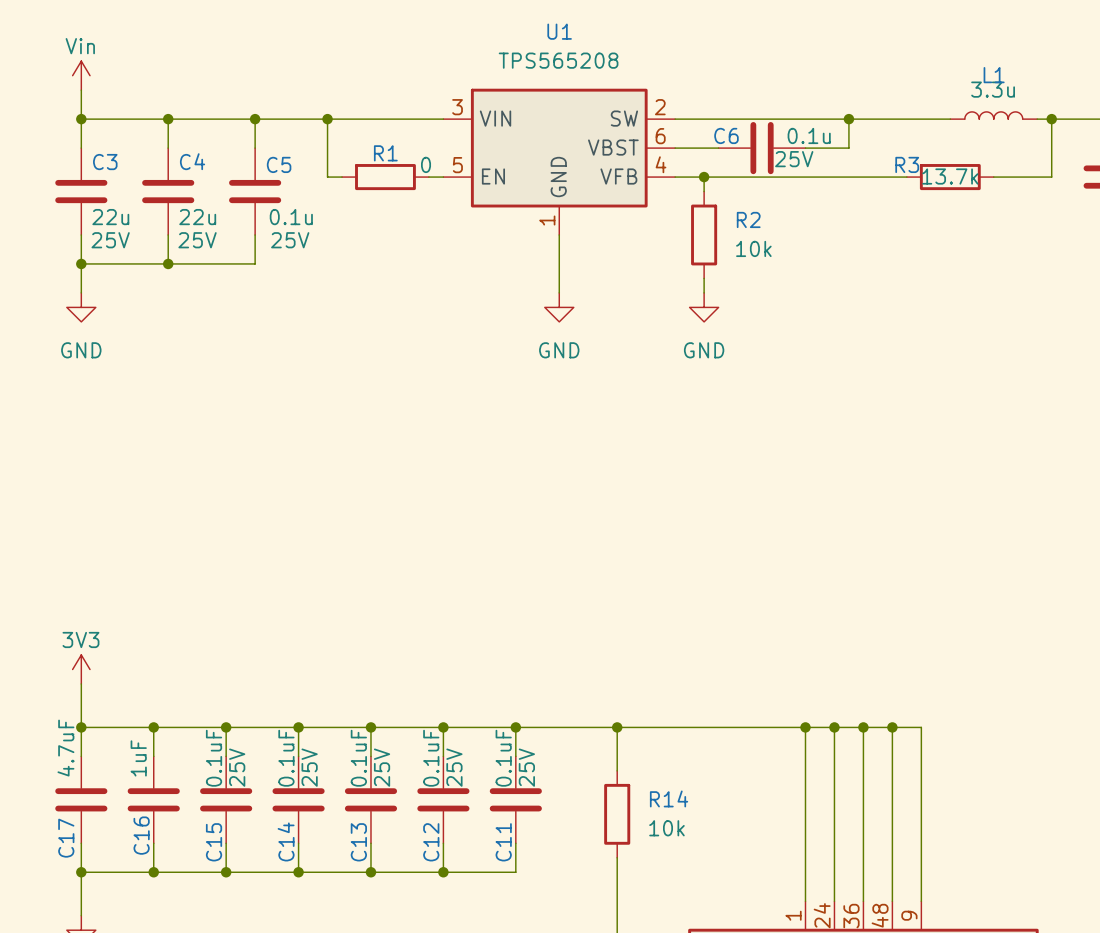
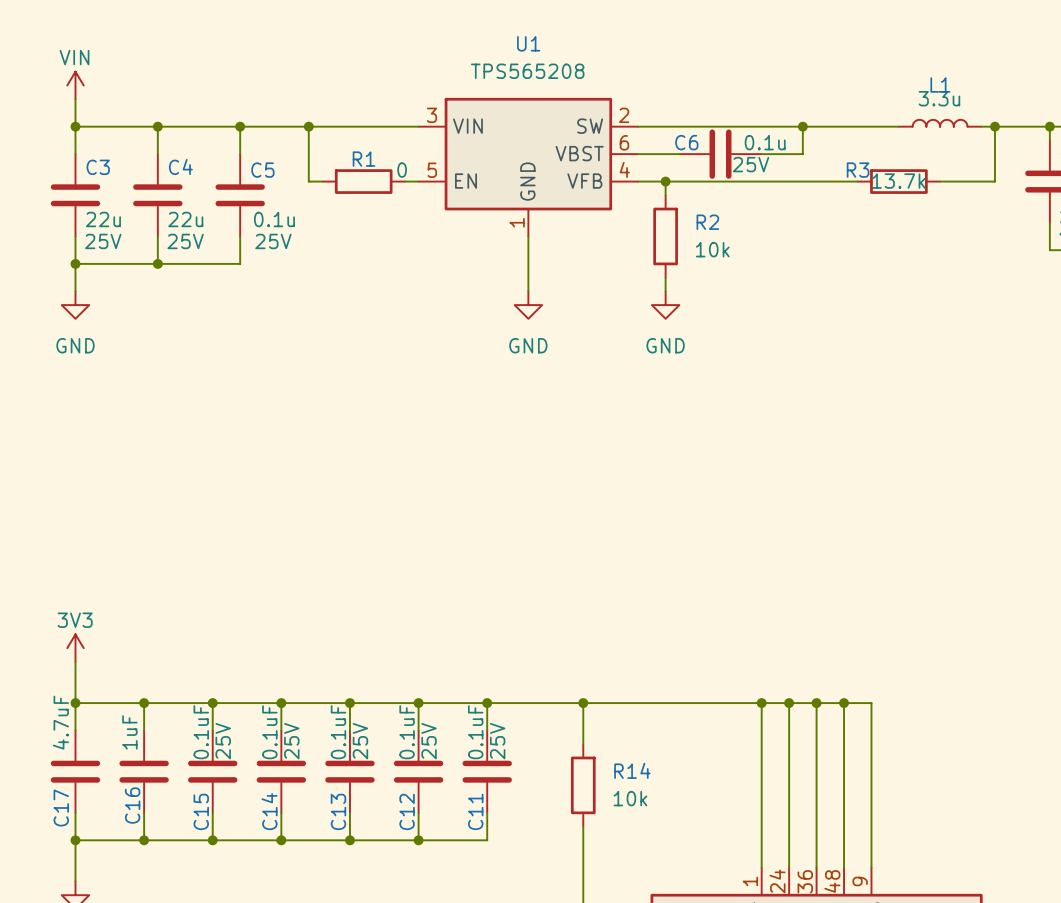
power symbol: Vin (81, 75) -> VIN (75, 85)

